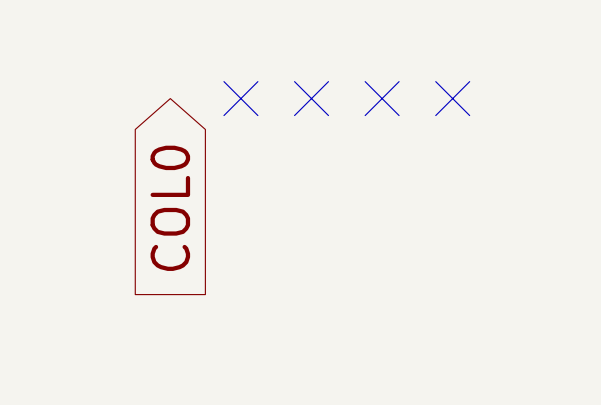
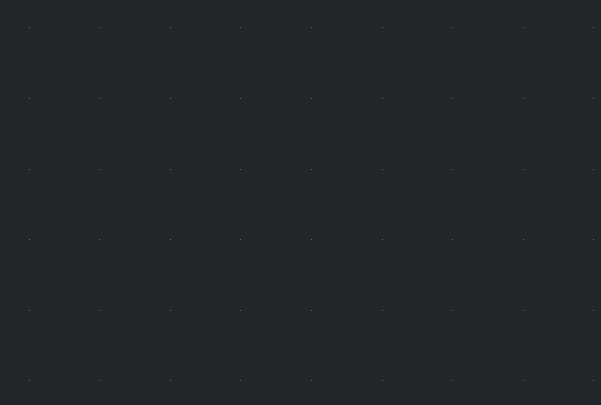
no-connect mark: (240, 98) -> none
no-connect mark: (311, 98) -> none
no-connect mark: (382, 98) -> none
no-connect mark: (452, 98) -> none
global label: COL0 (170, 208) -> none

